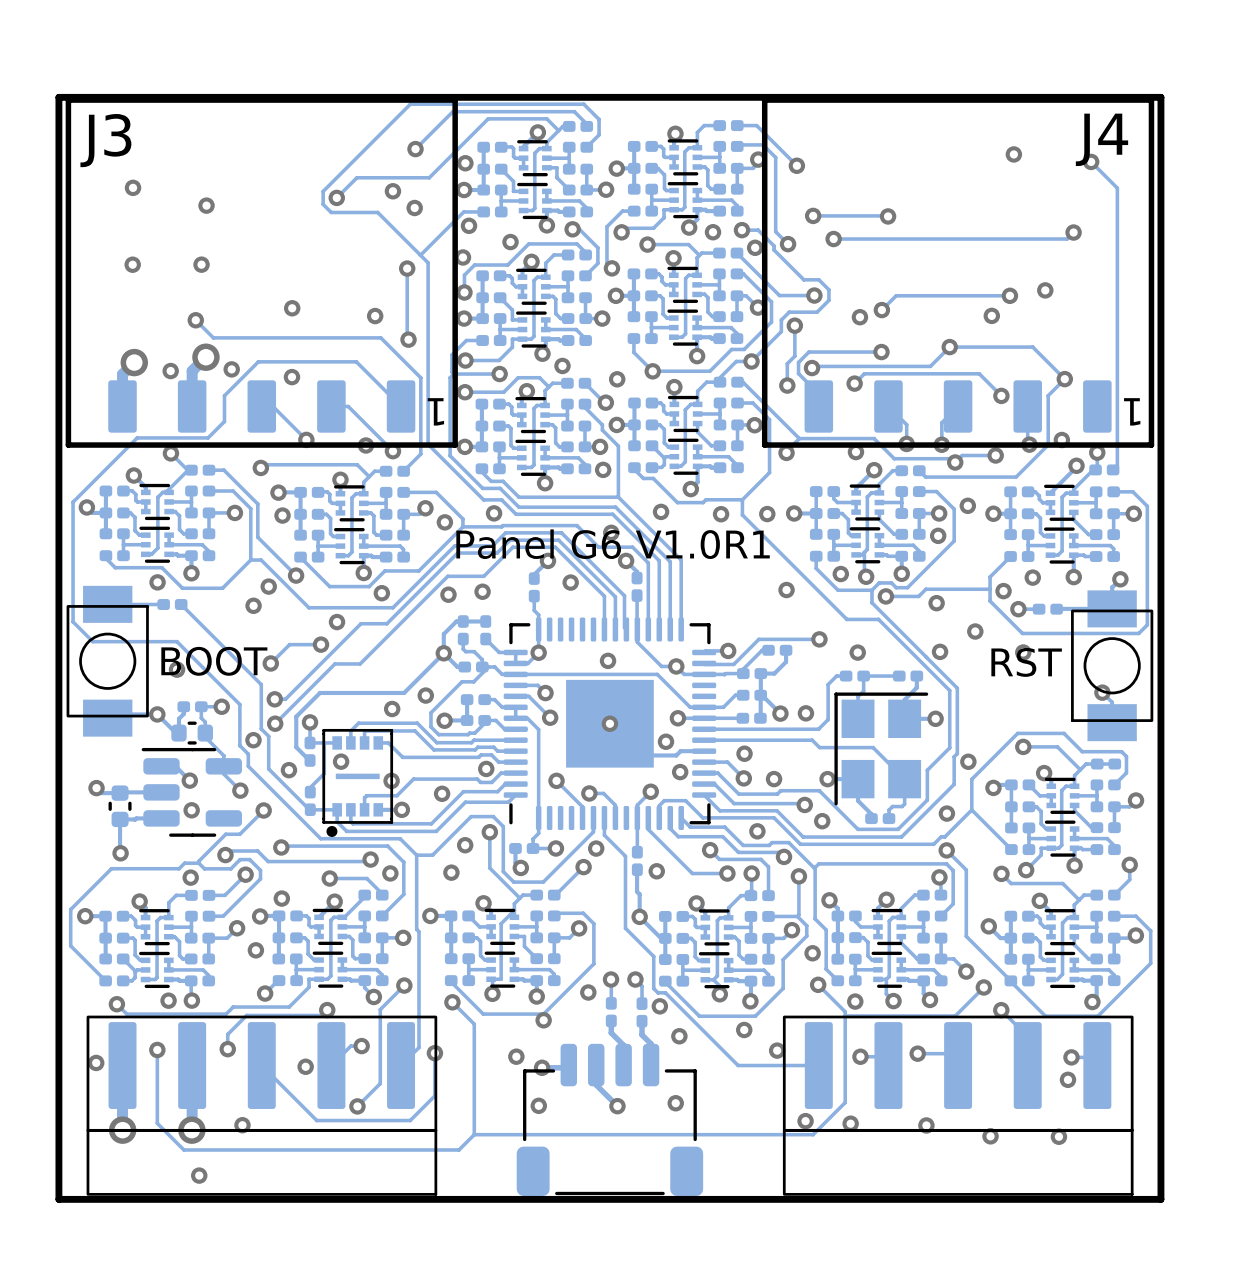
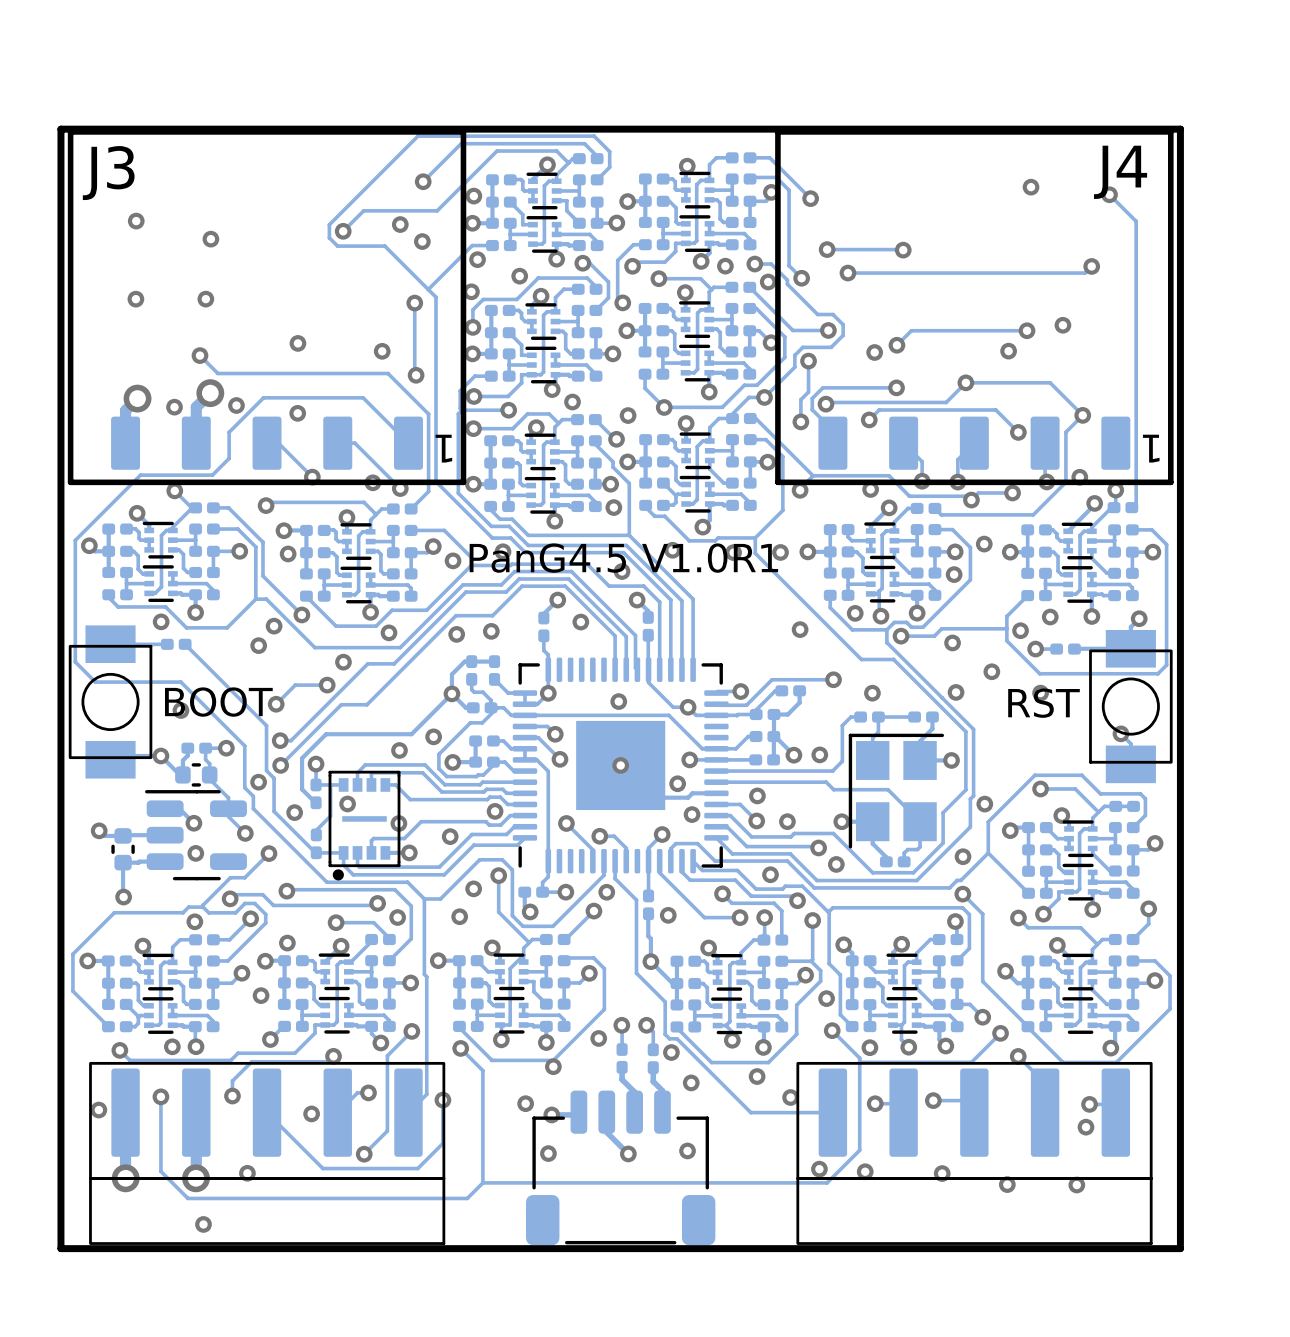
text: Panel G6 V1.0R1 (613, 544) -> PanG4.5 V1.0R1 (623, 558)

